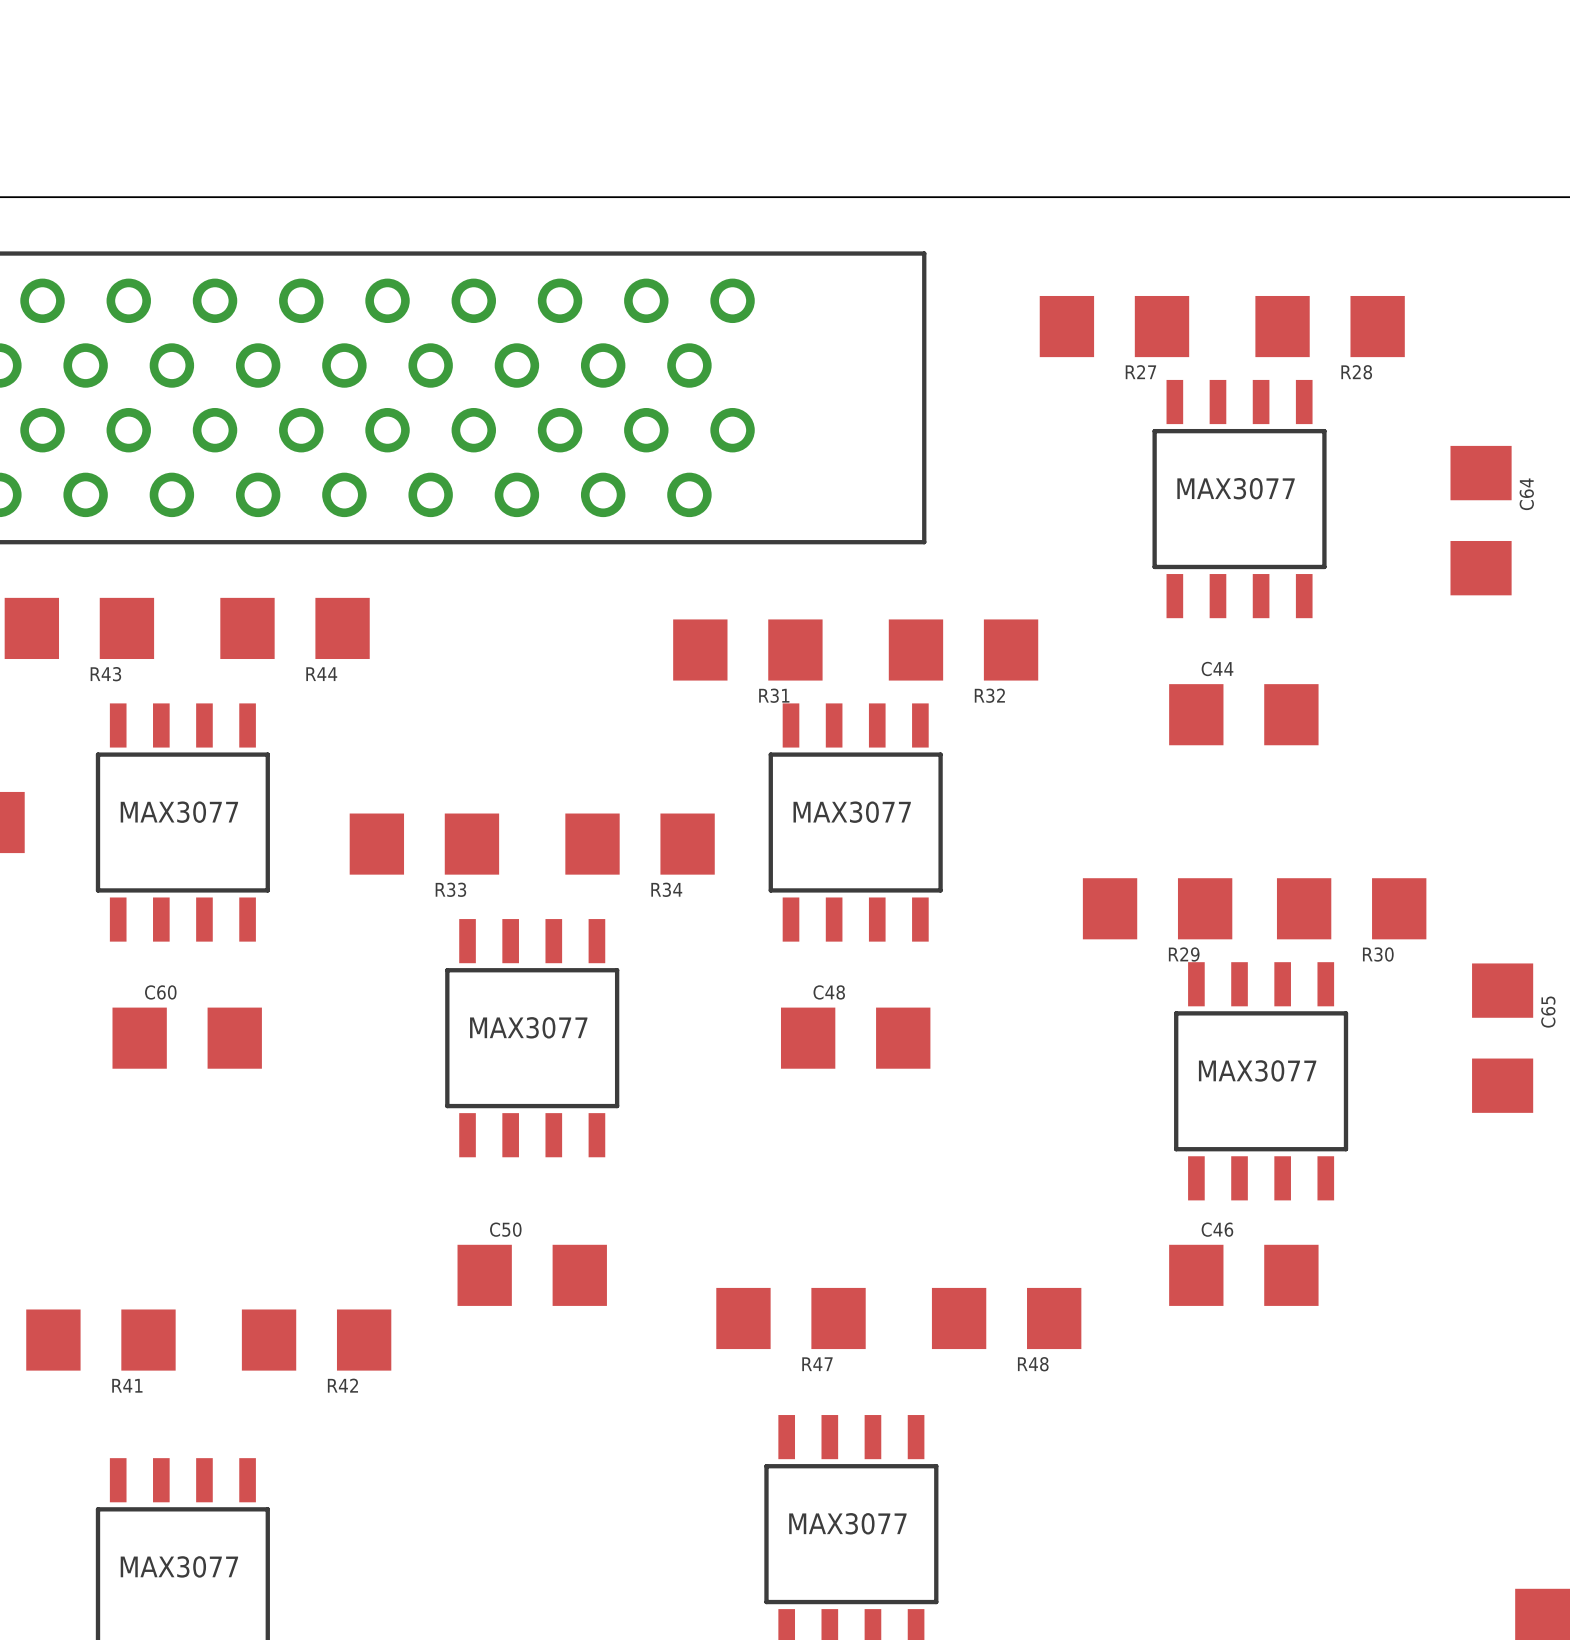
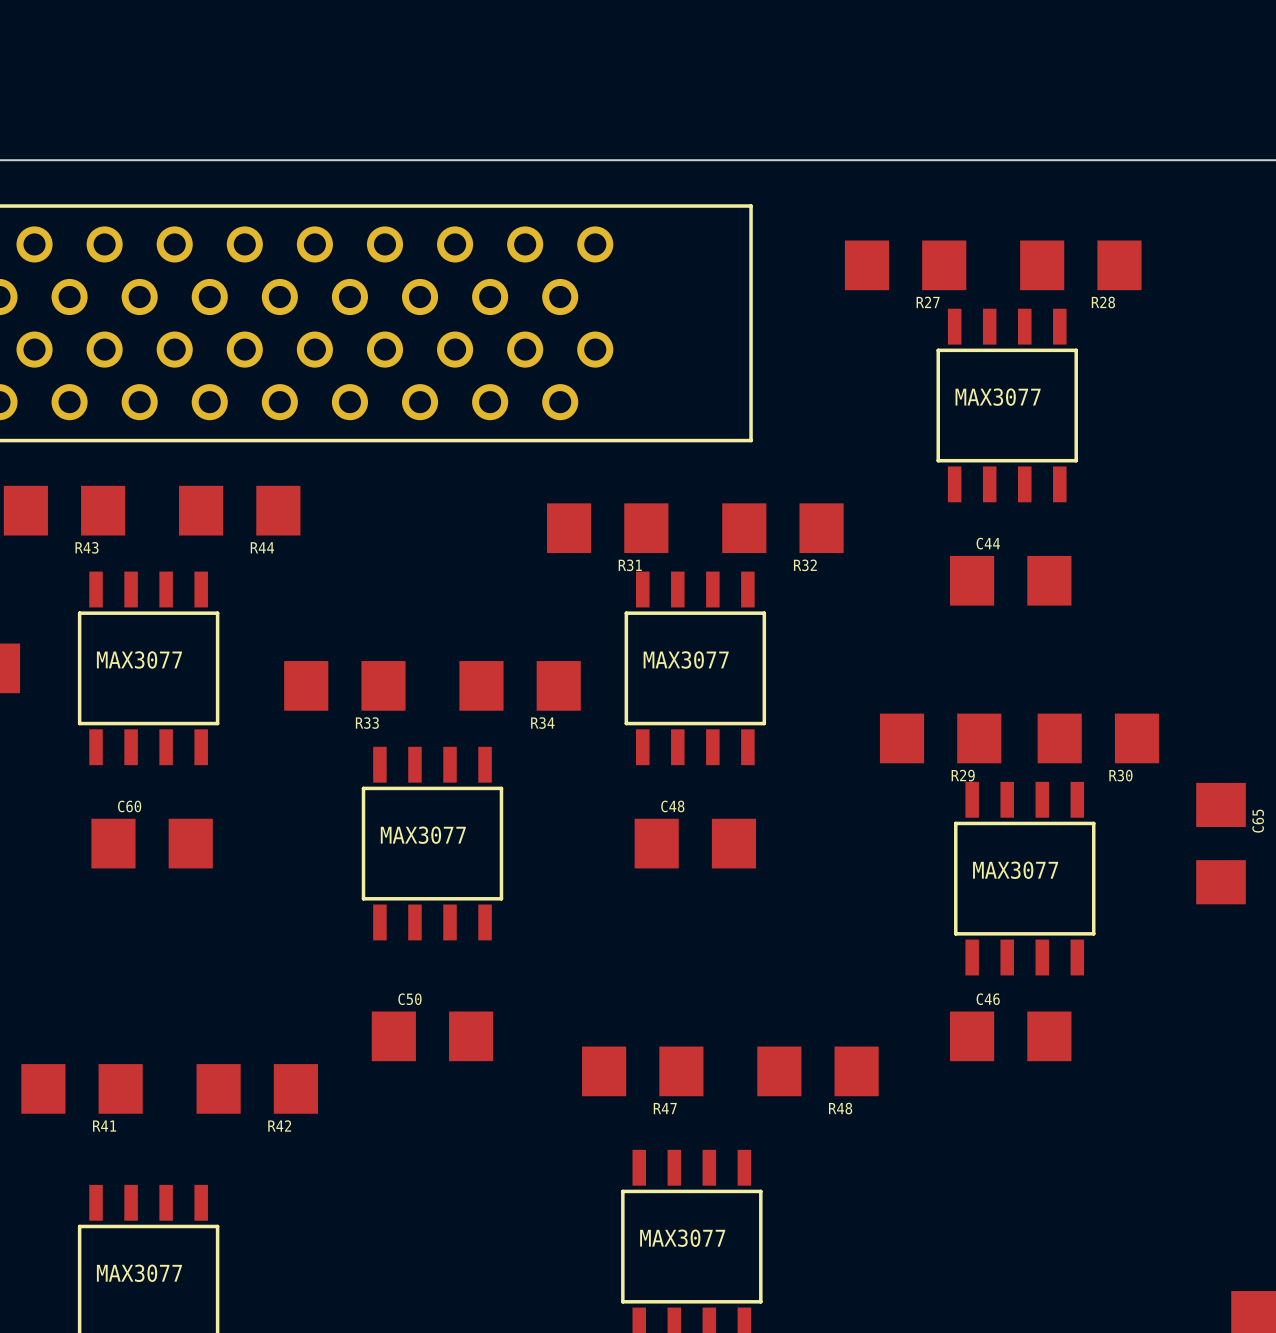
C64: (1481, 520) -> none

